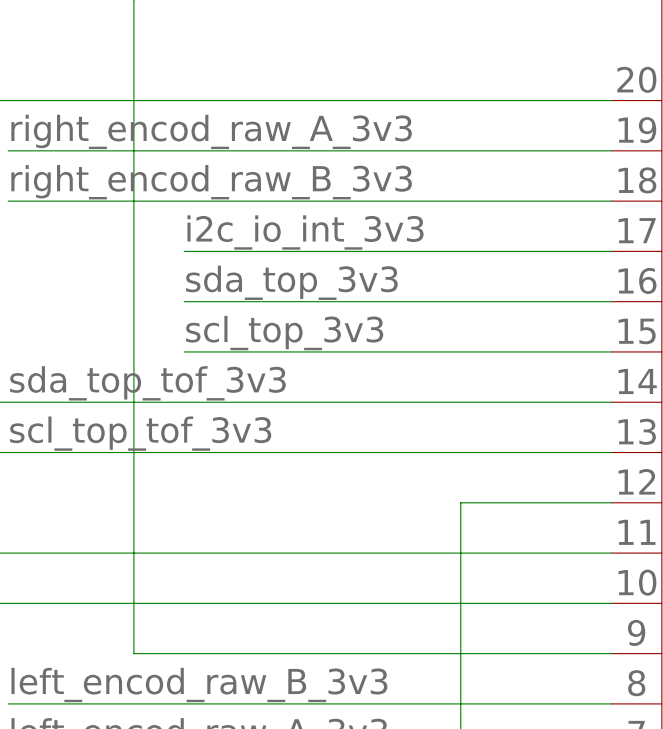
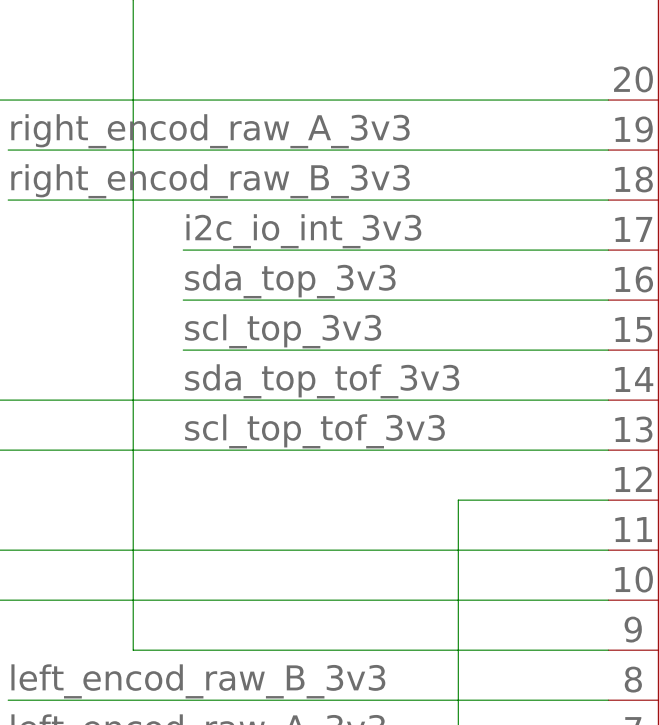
label position: sda_top_tof_3v3 (147, 383) -> sda_top_tof_3v3 (322, 381)
label position: scl_top_tof_3v3 (140, 433) -> scl_top_tof_3v3 (314, 431)

